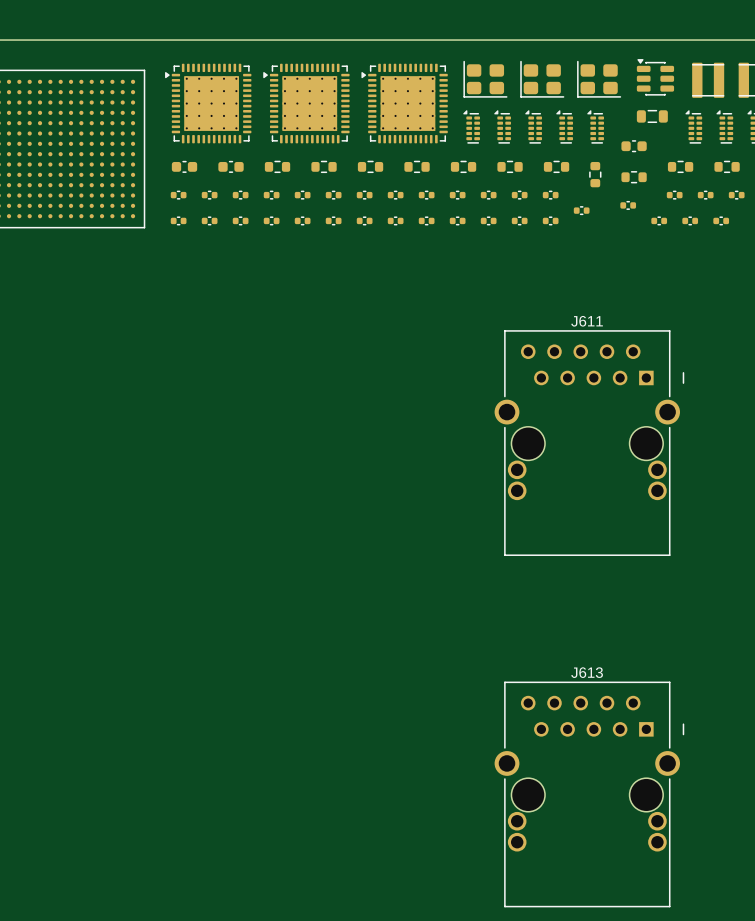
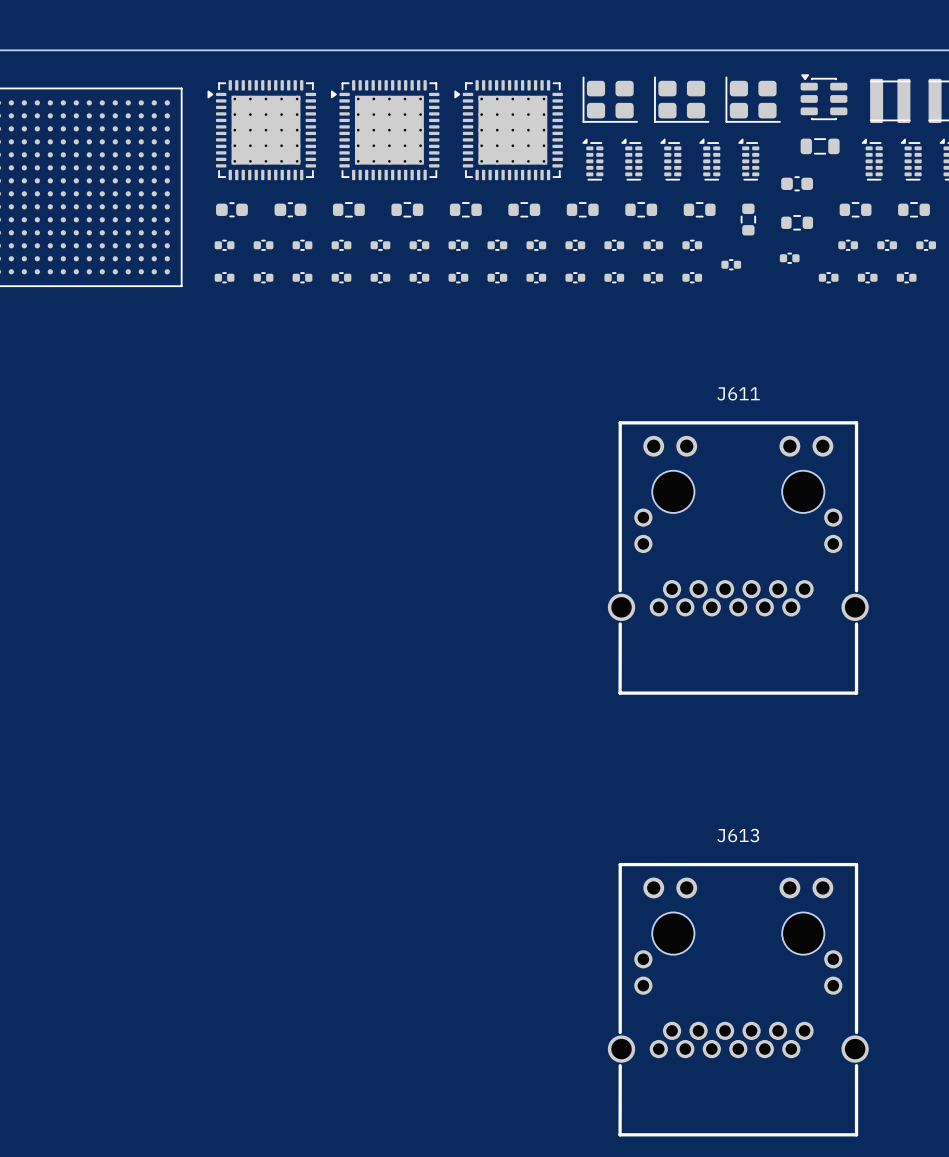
J611 footprint: [494, 330, 685, 556] -> [607, 421, 869, 695]
J613 footprint: [494, 681, 685, 908] -> [607, 862, 869, 1137]

